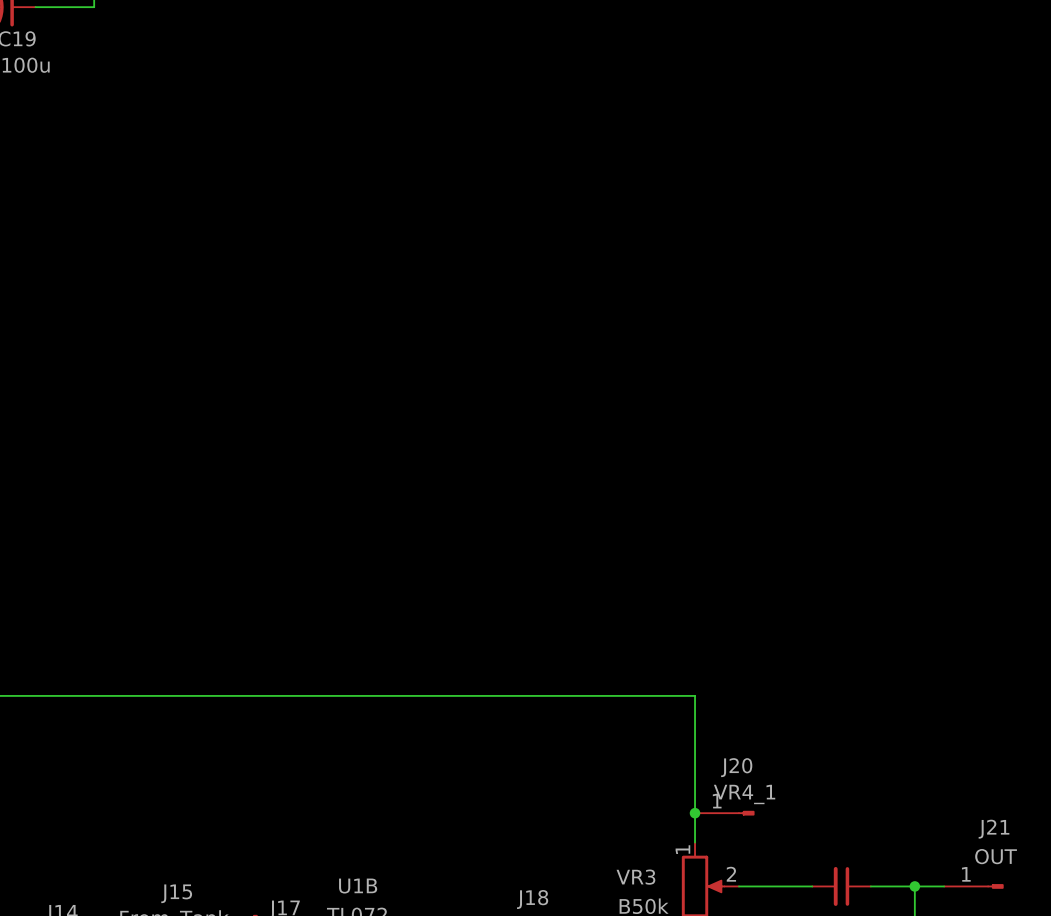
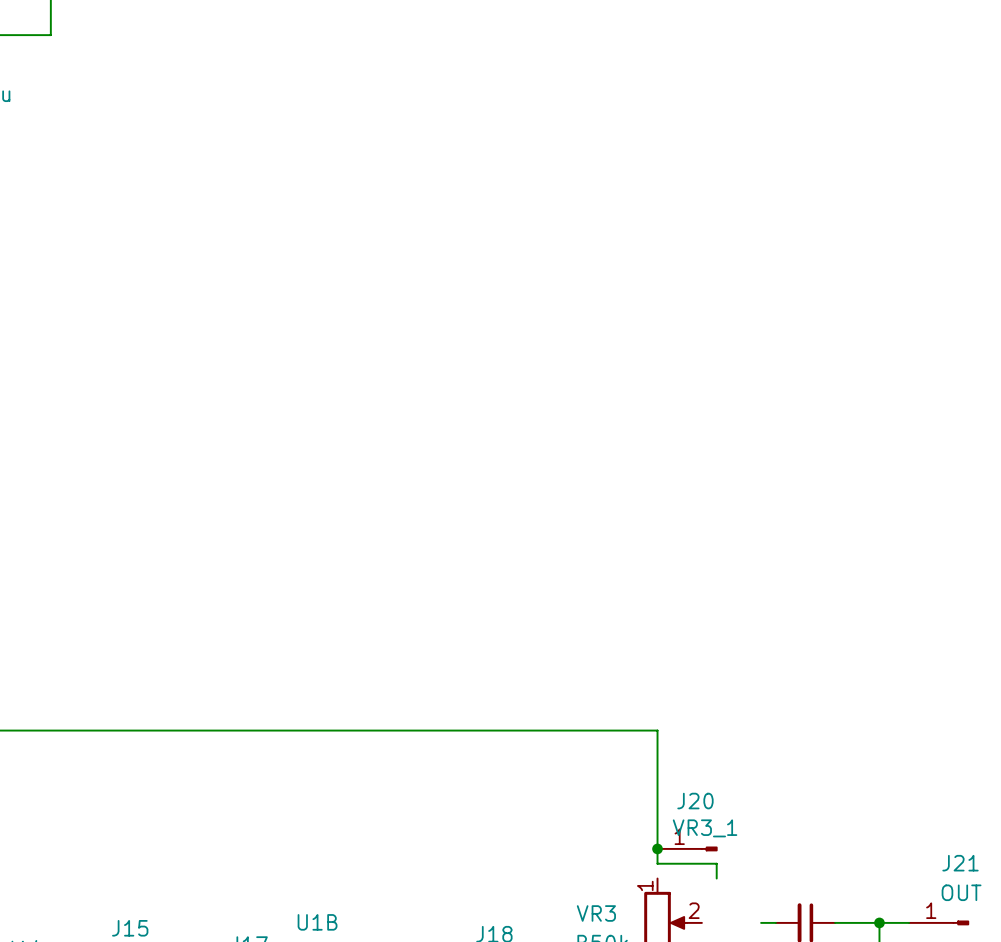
J20 value: VR4_1 (744, 794) -> VR3_1 (705, 828)
wire: (695, 827) (695, 842) -> (657, 863) (716, 863) (716, 878)
wire: (738, 886) (797, 886) -> none

